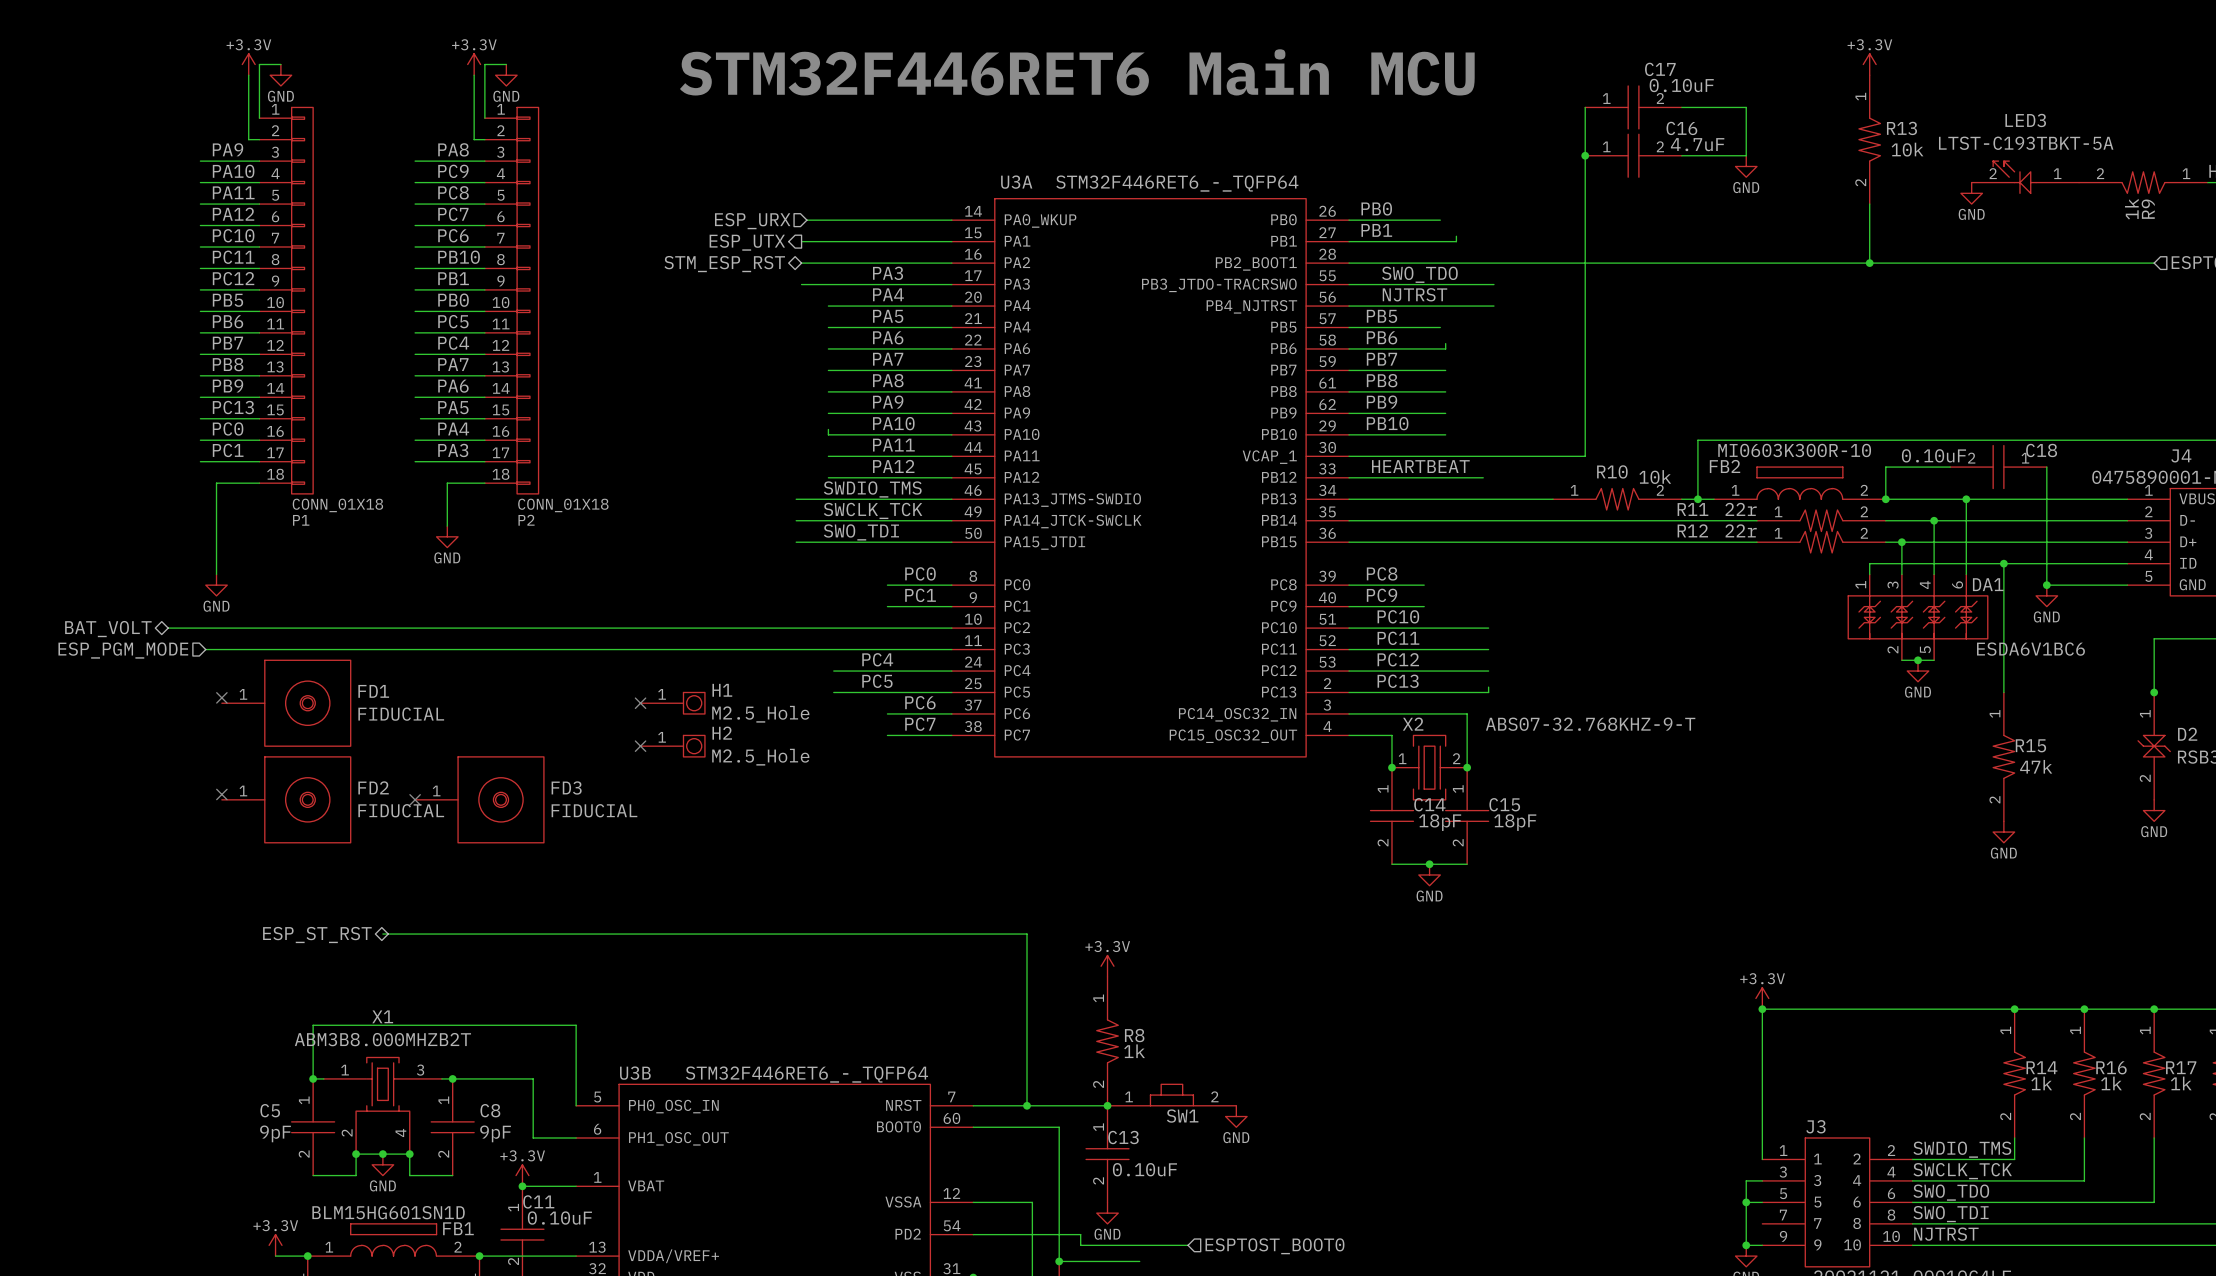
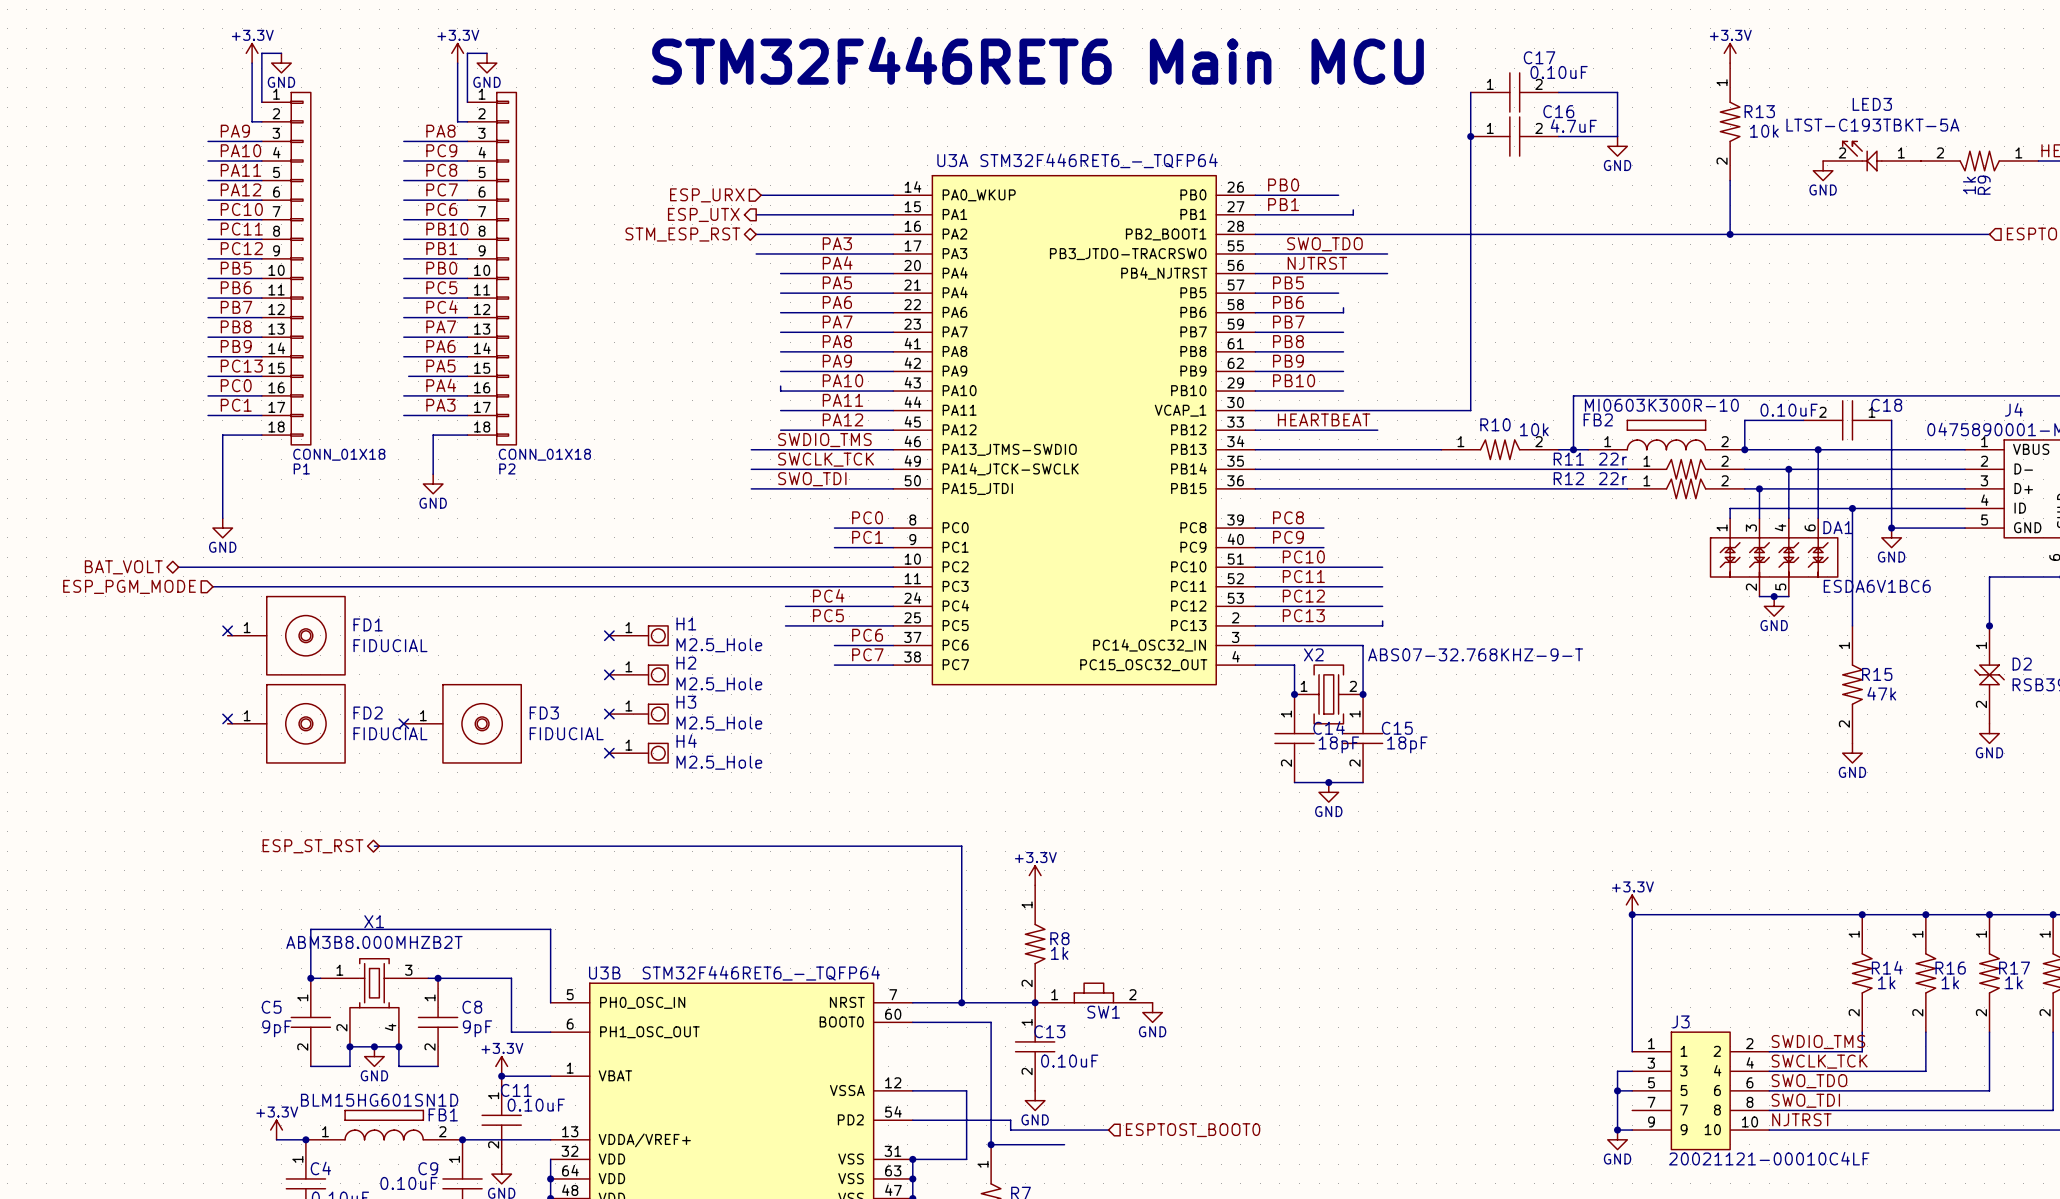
no-connect mark: none -> (609, 714)
H3: none -> M2.5_Hole (638, 714)
no-connect mark: none -> (609, 753)
H4: none -> M2.5_Hole (638, 753)

